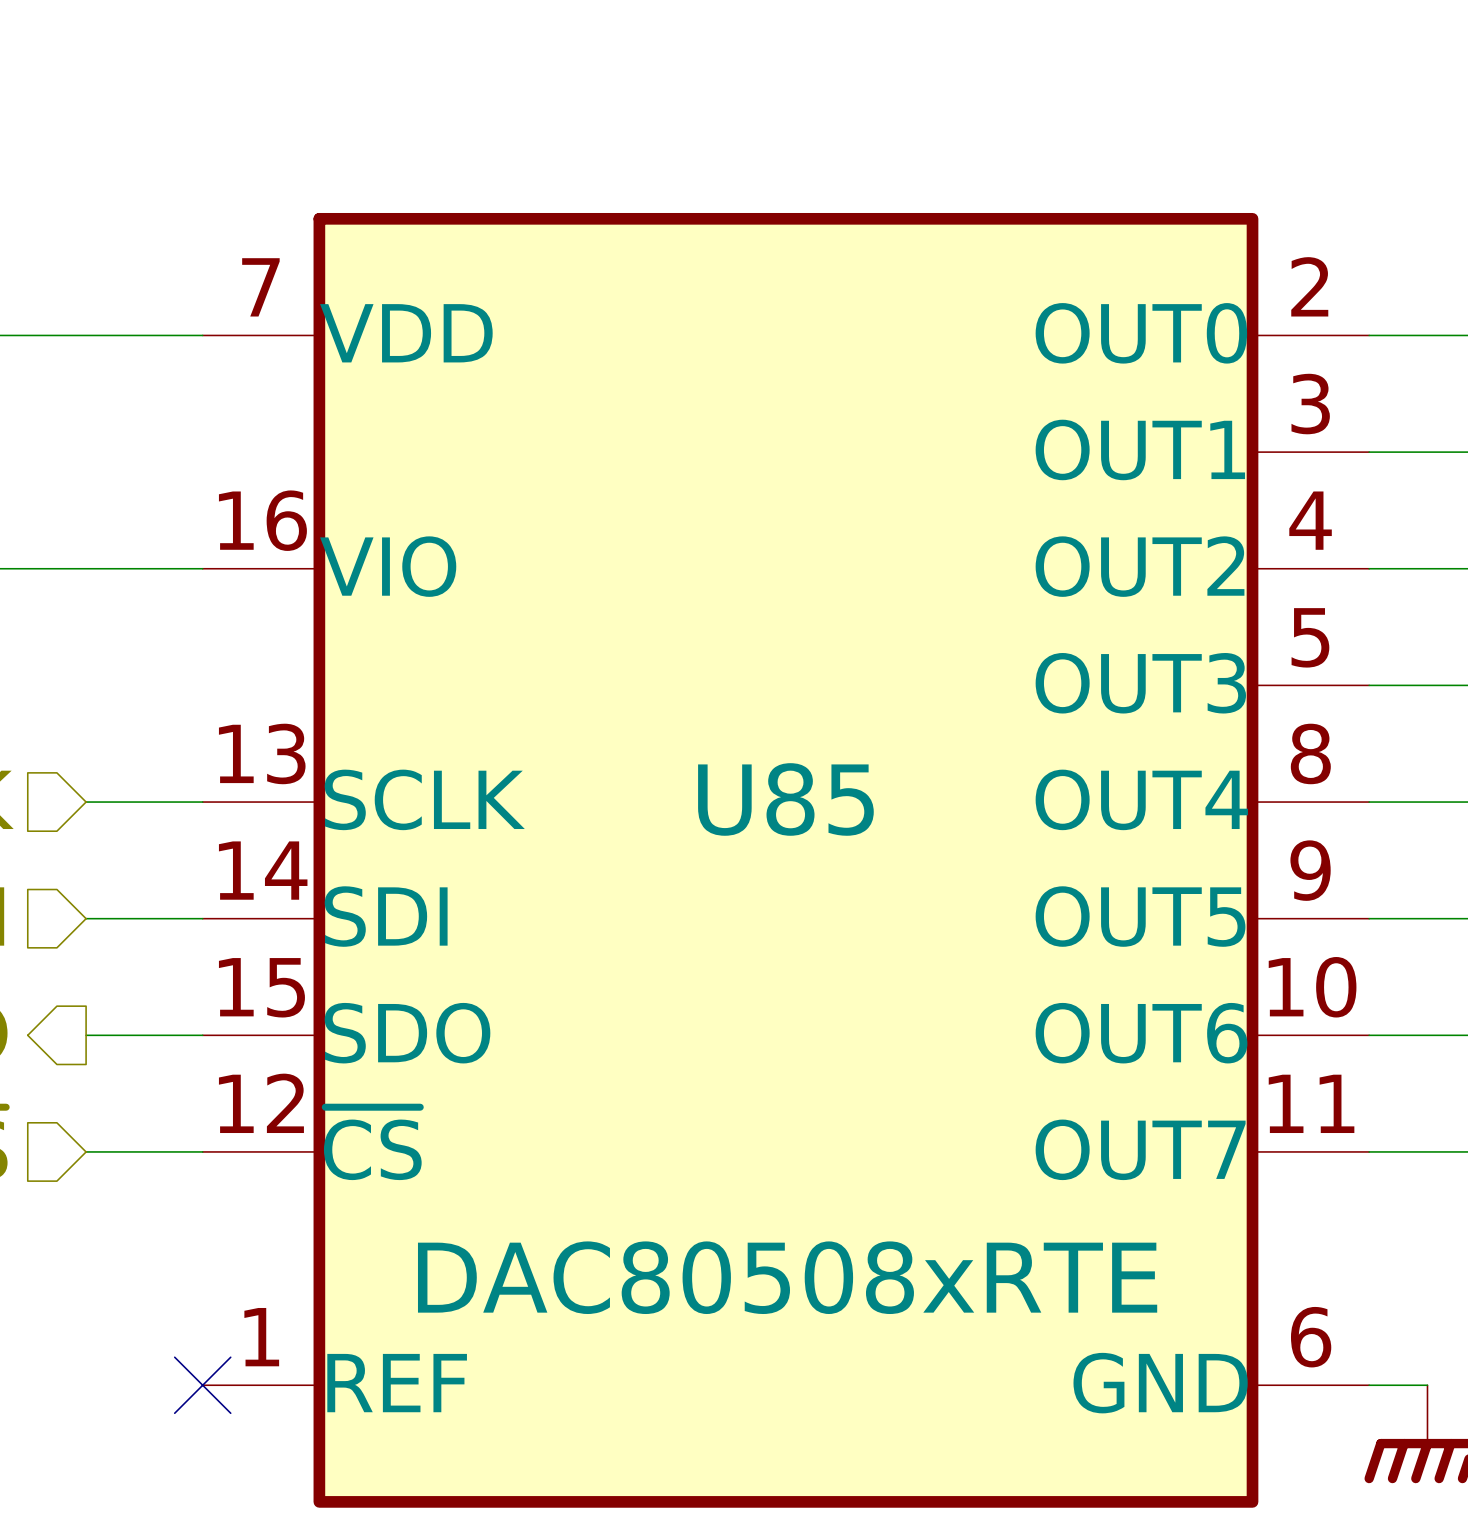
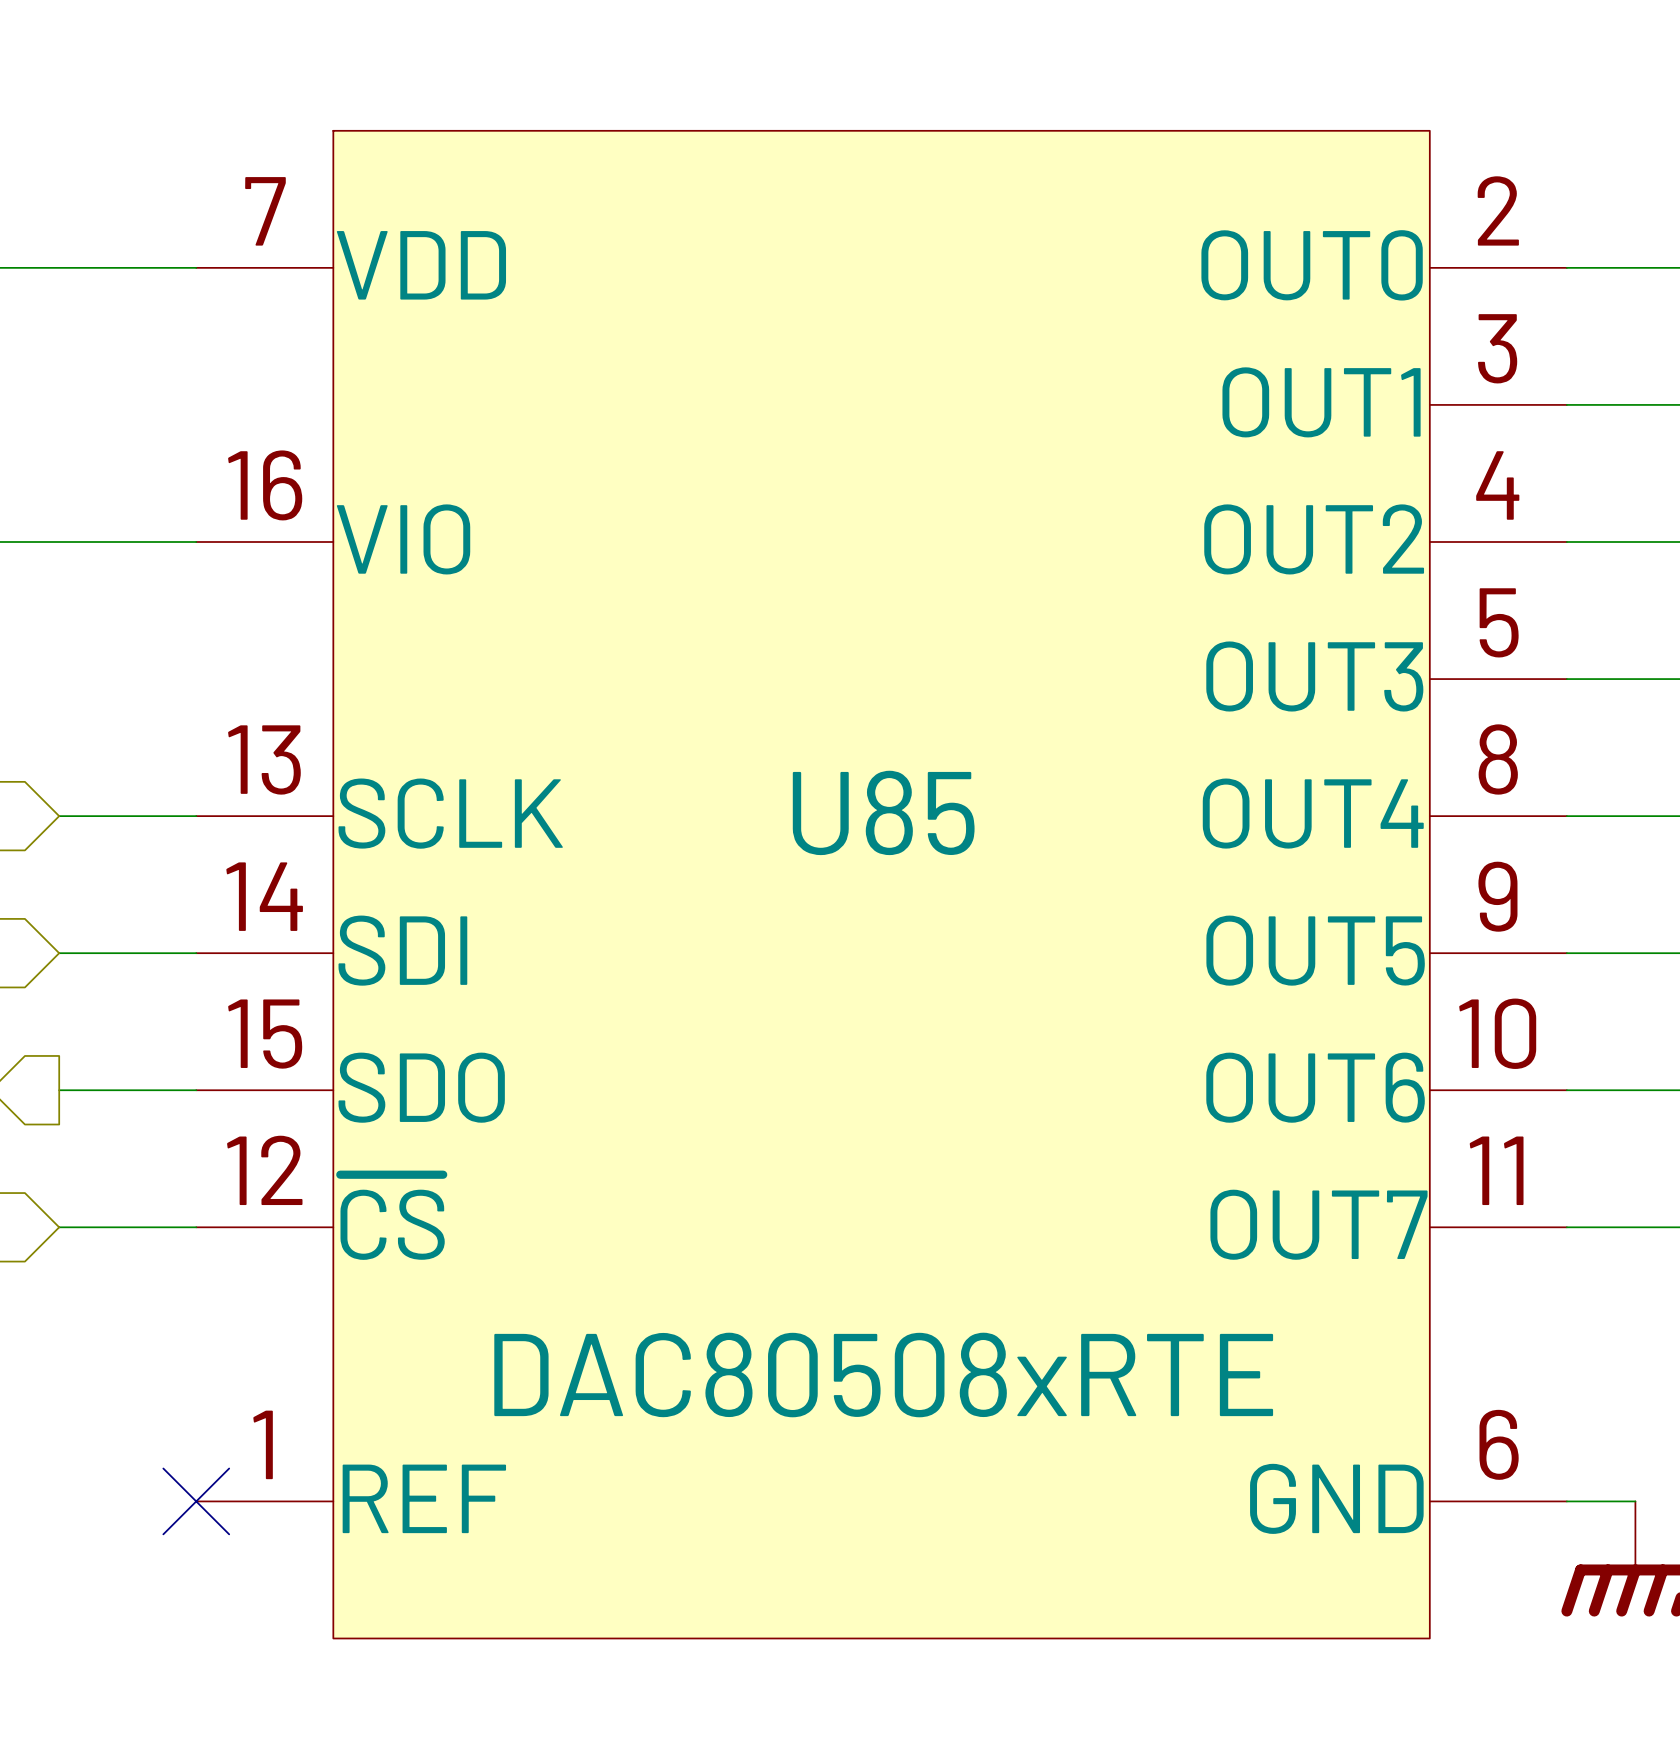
U85 symbol: [202, 212, 1370, 1508] -> [196, 130, 1567, 1639]

